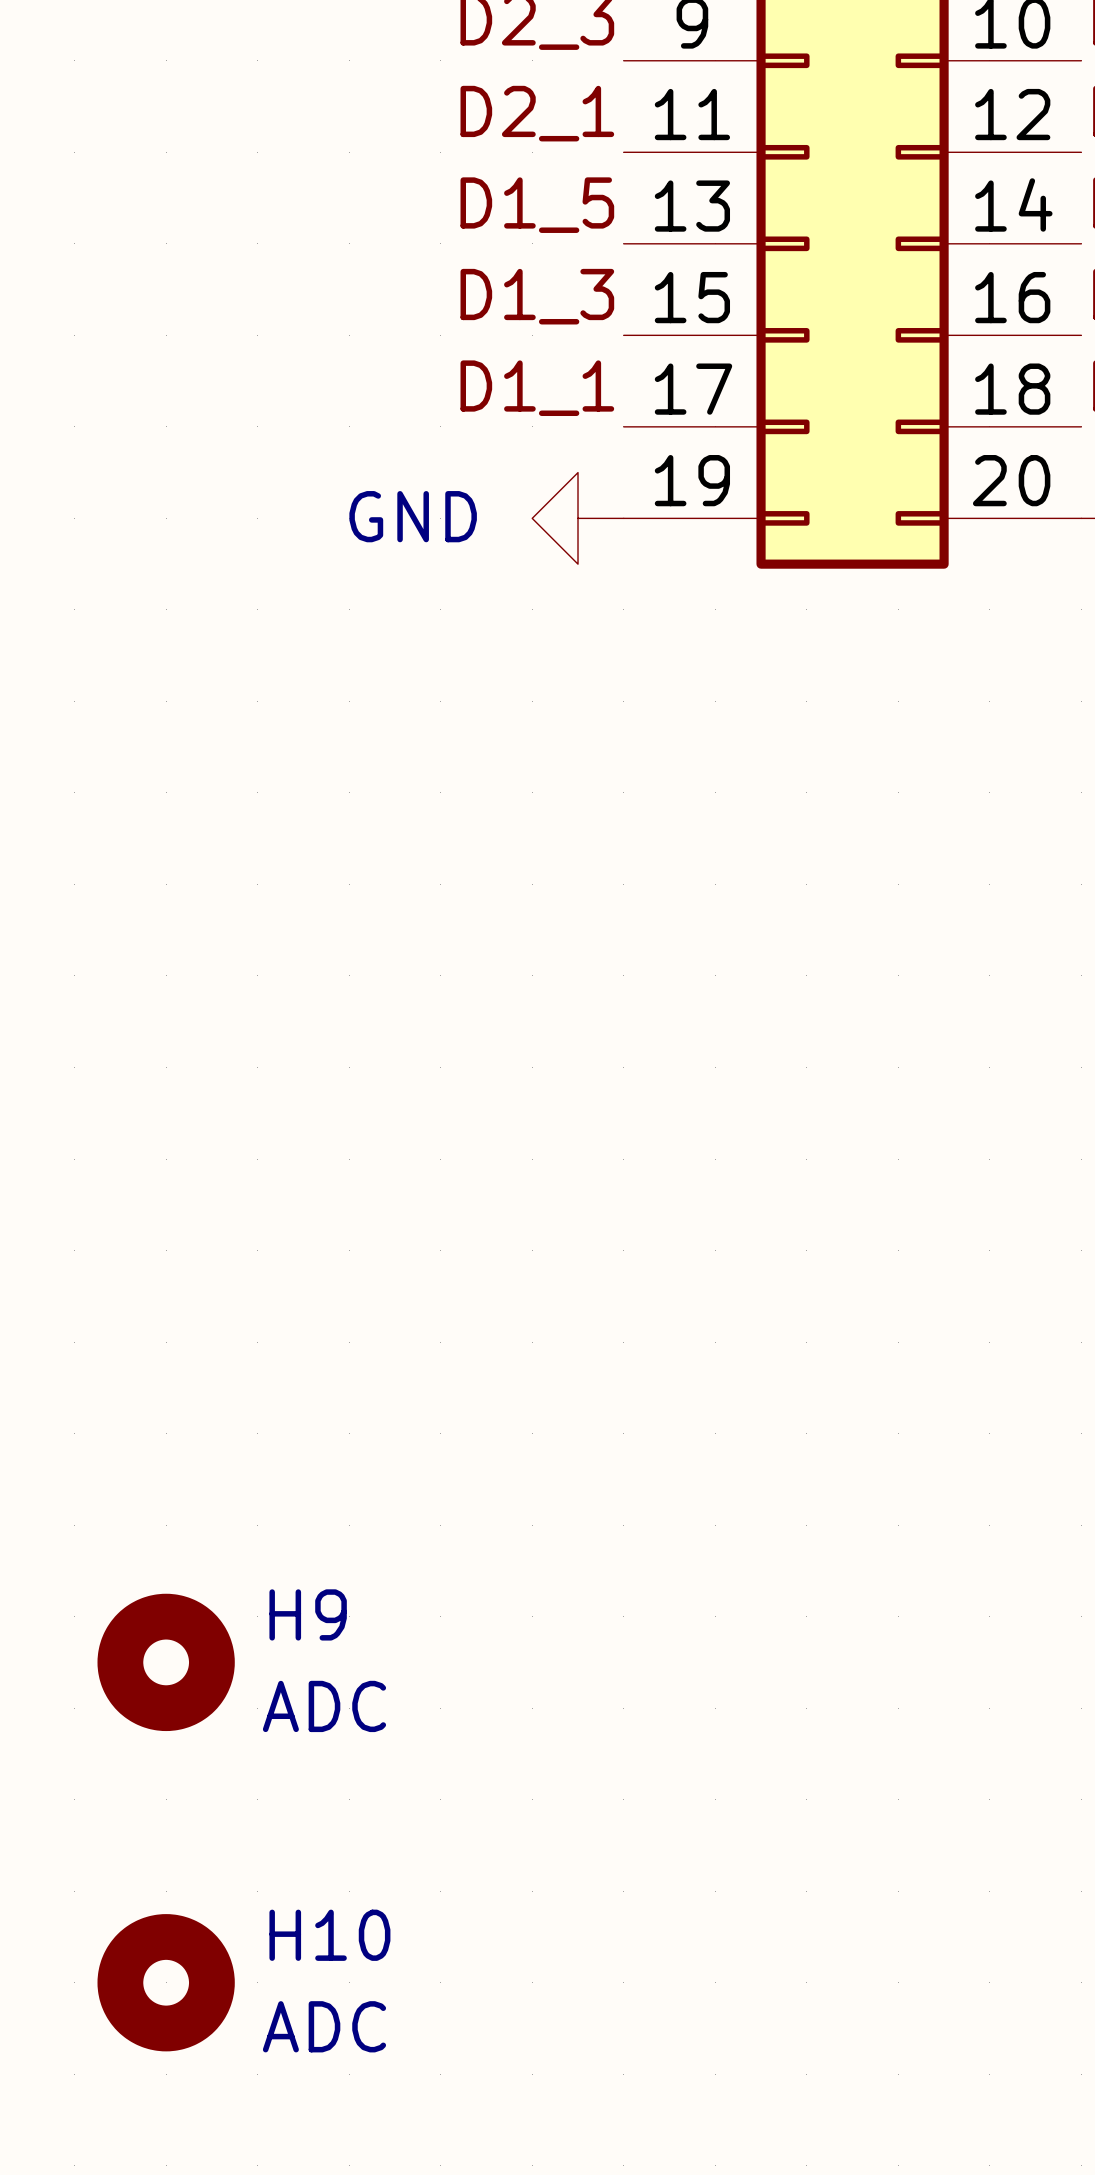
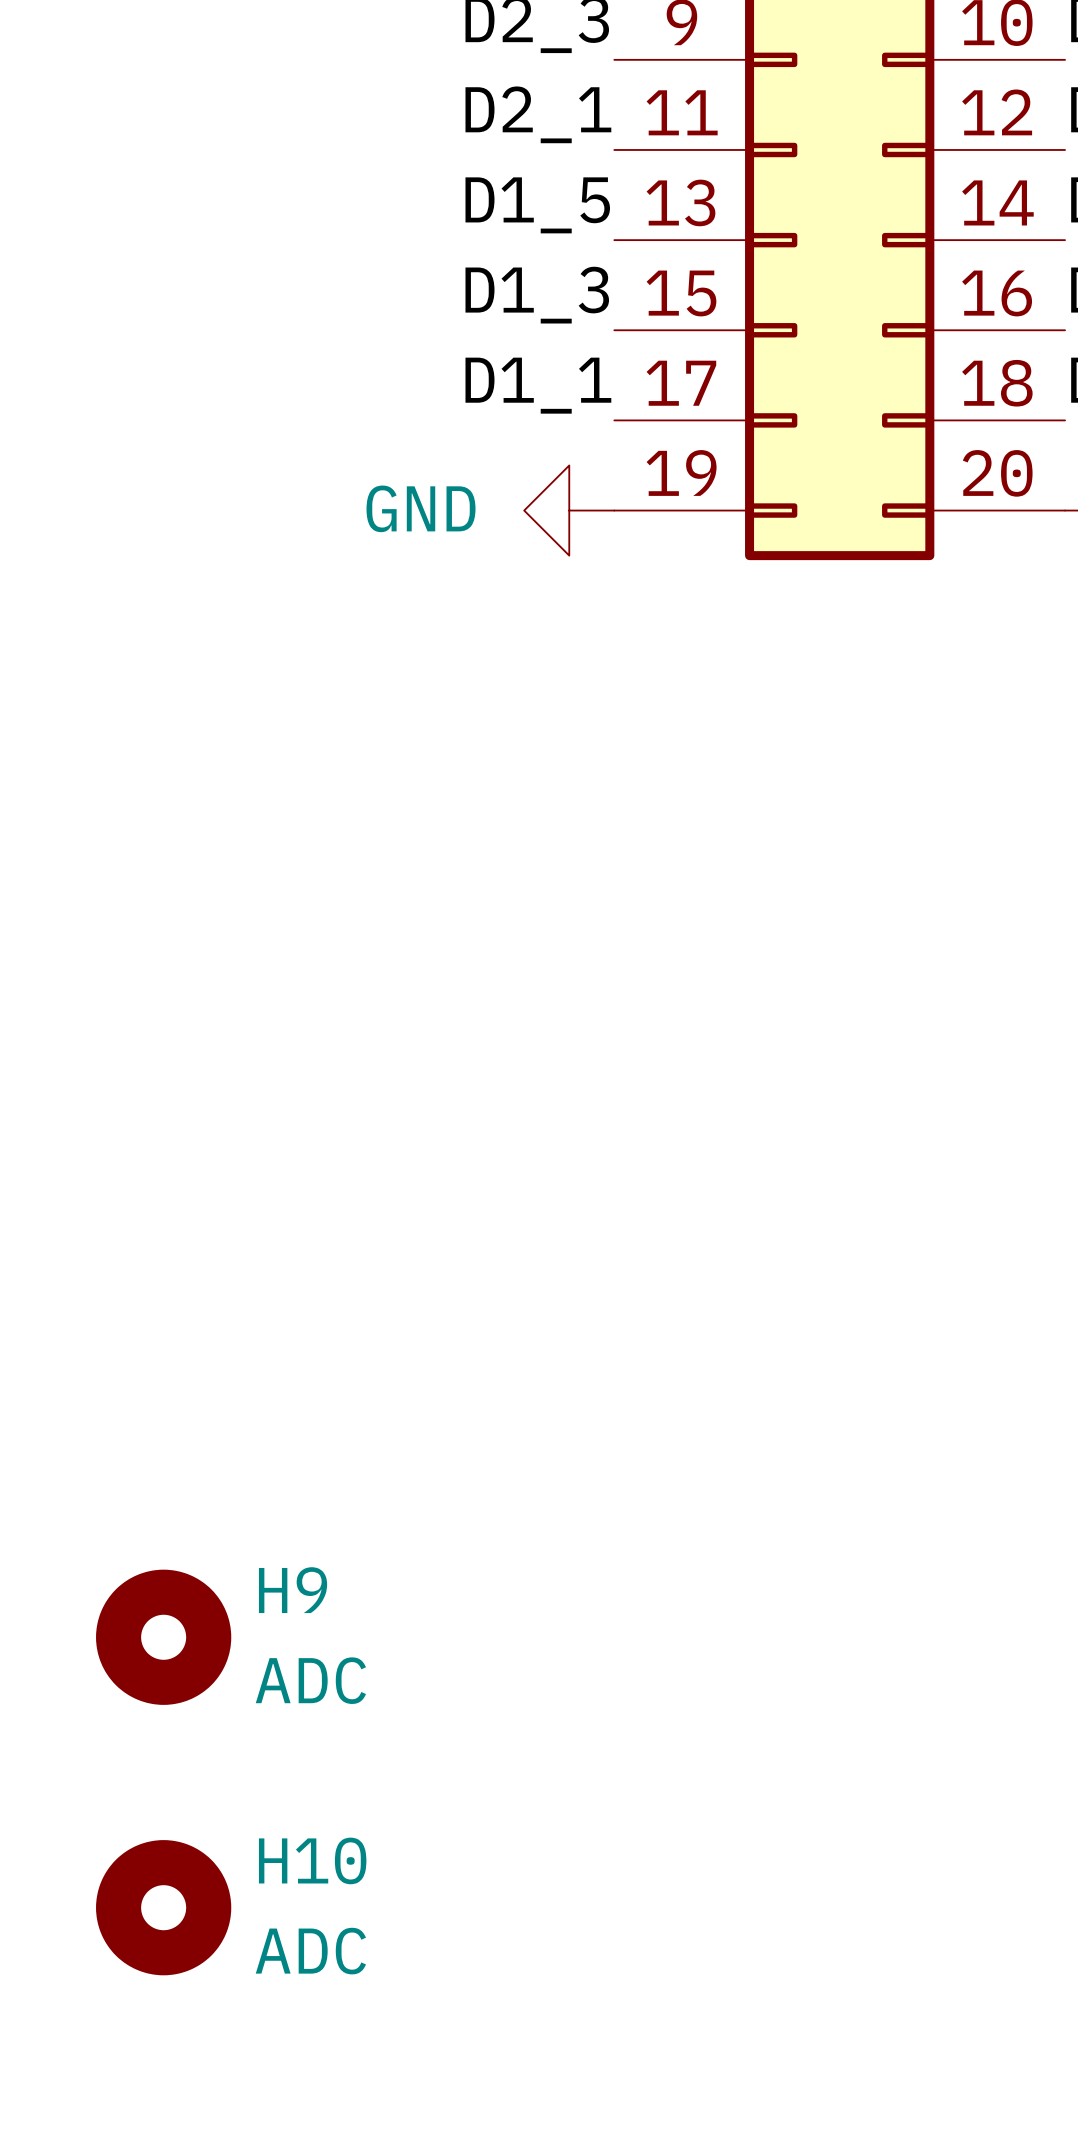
H10 position: (166, 1982) -> (163, 1907)

